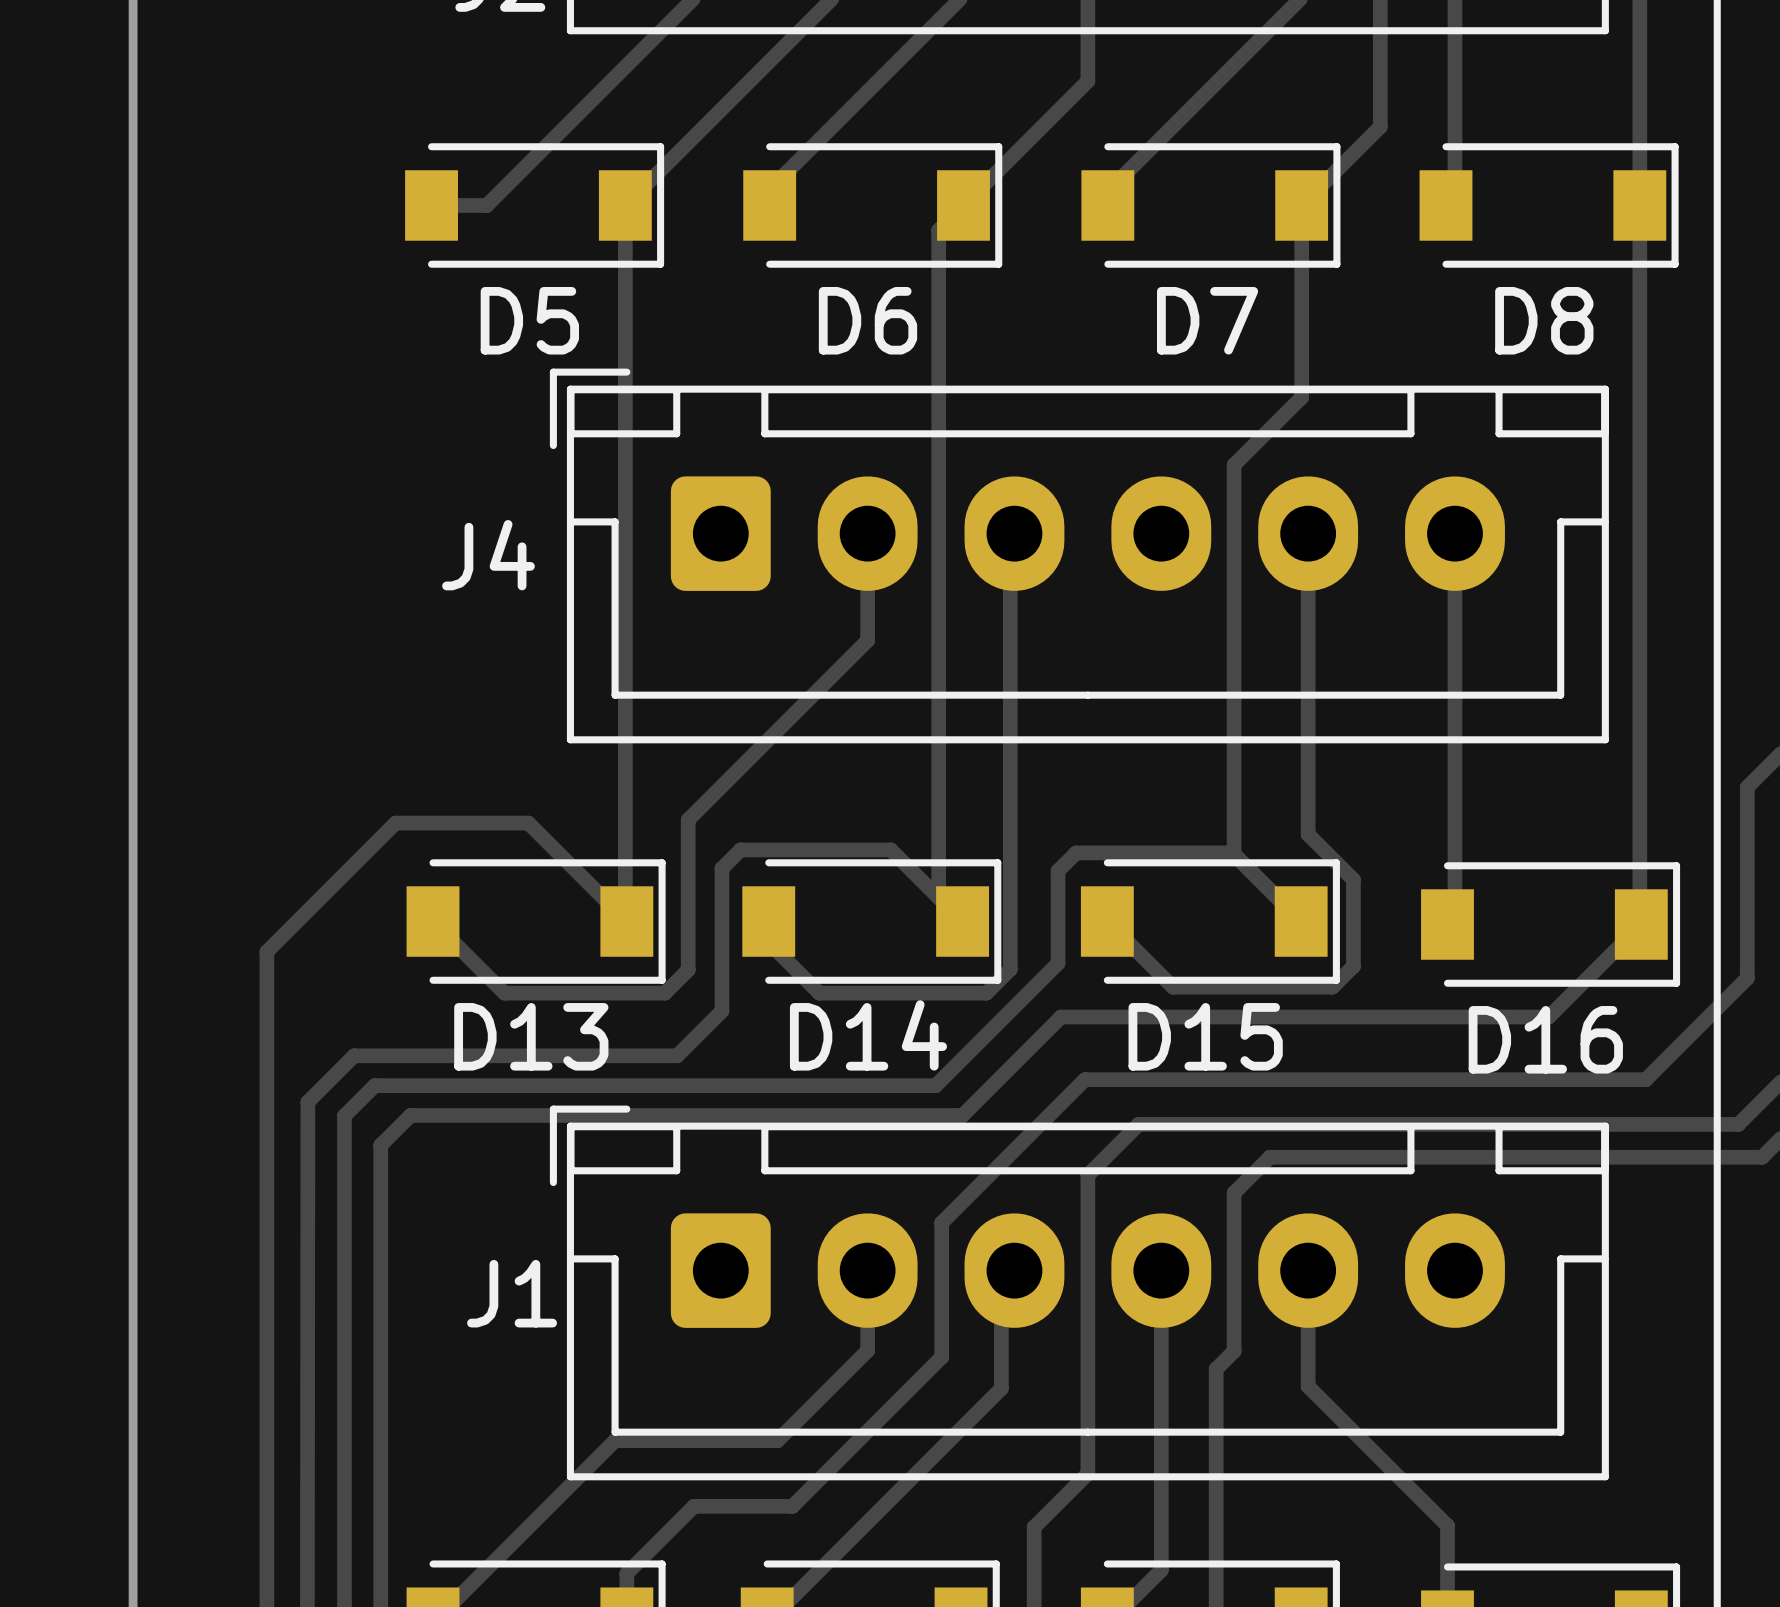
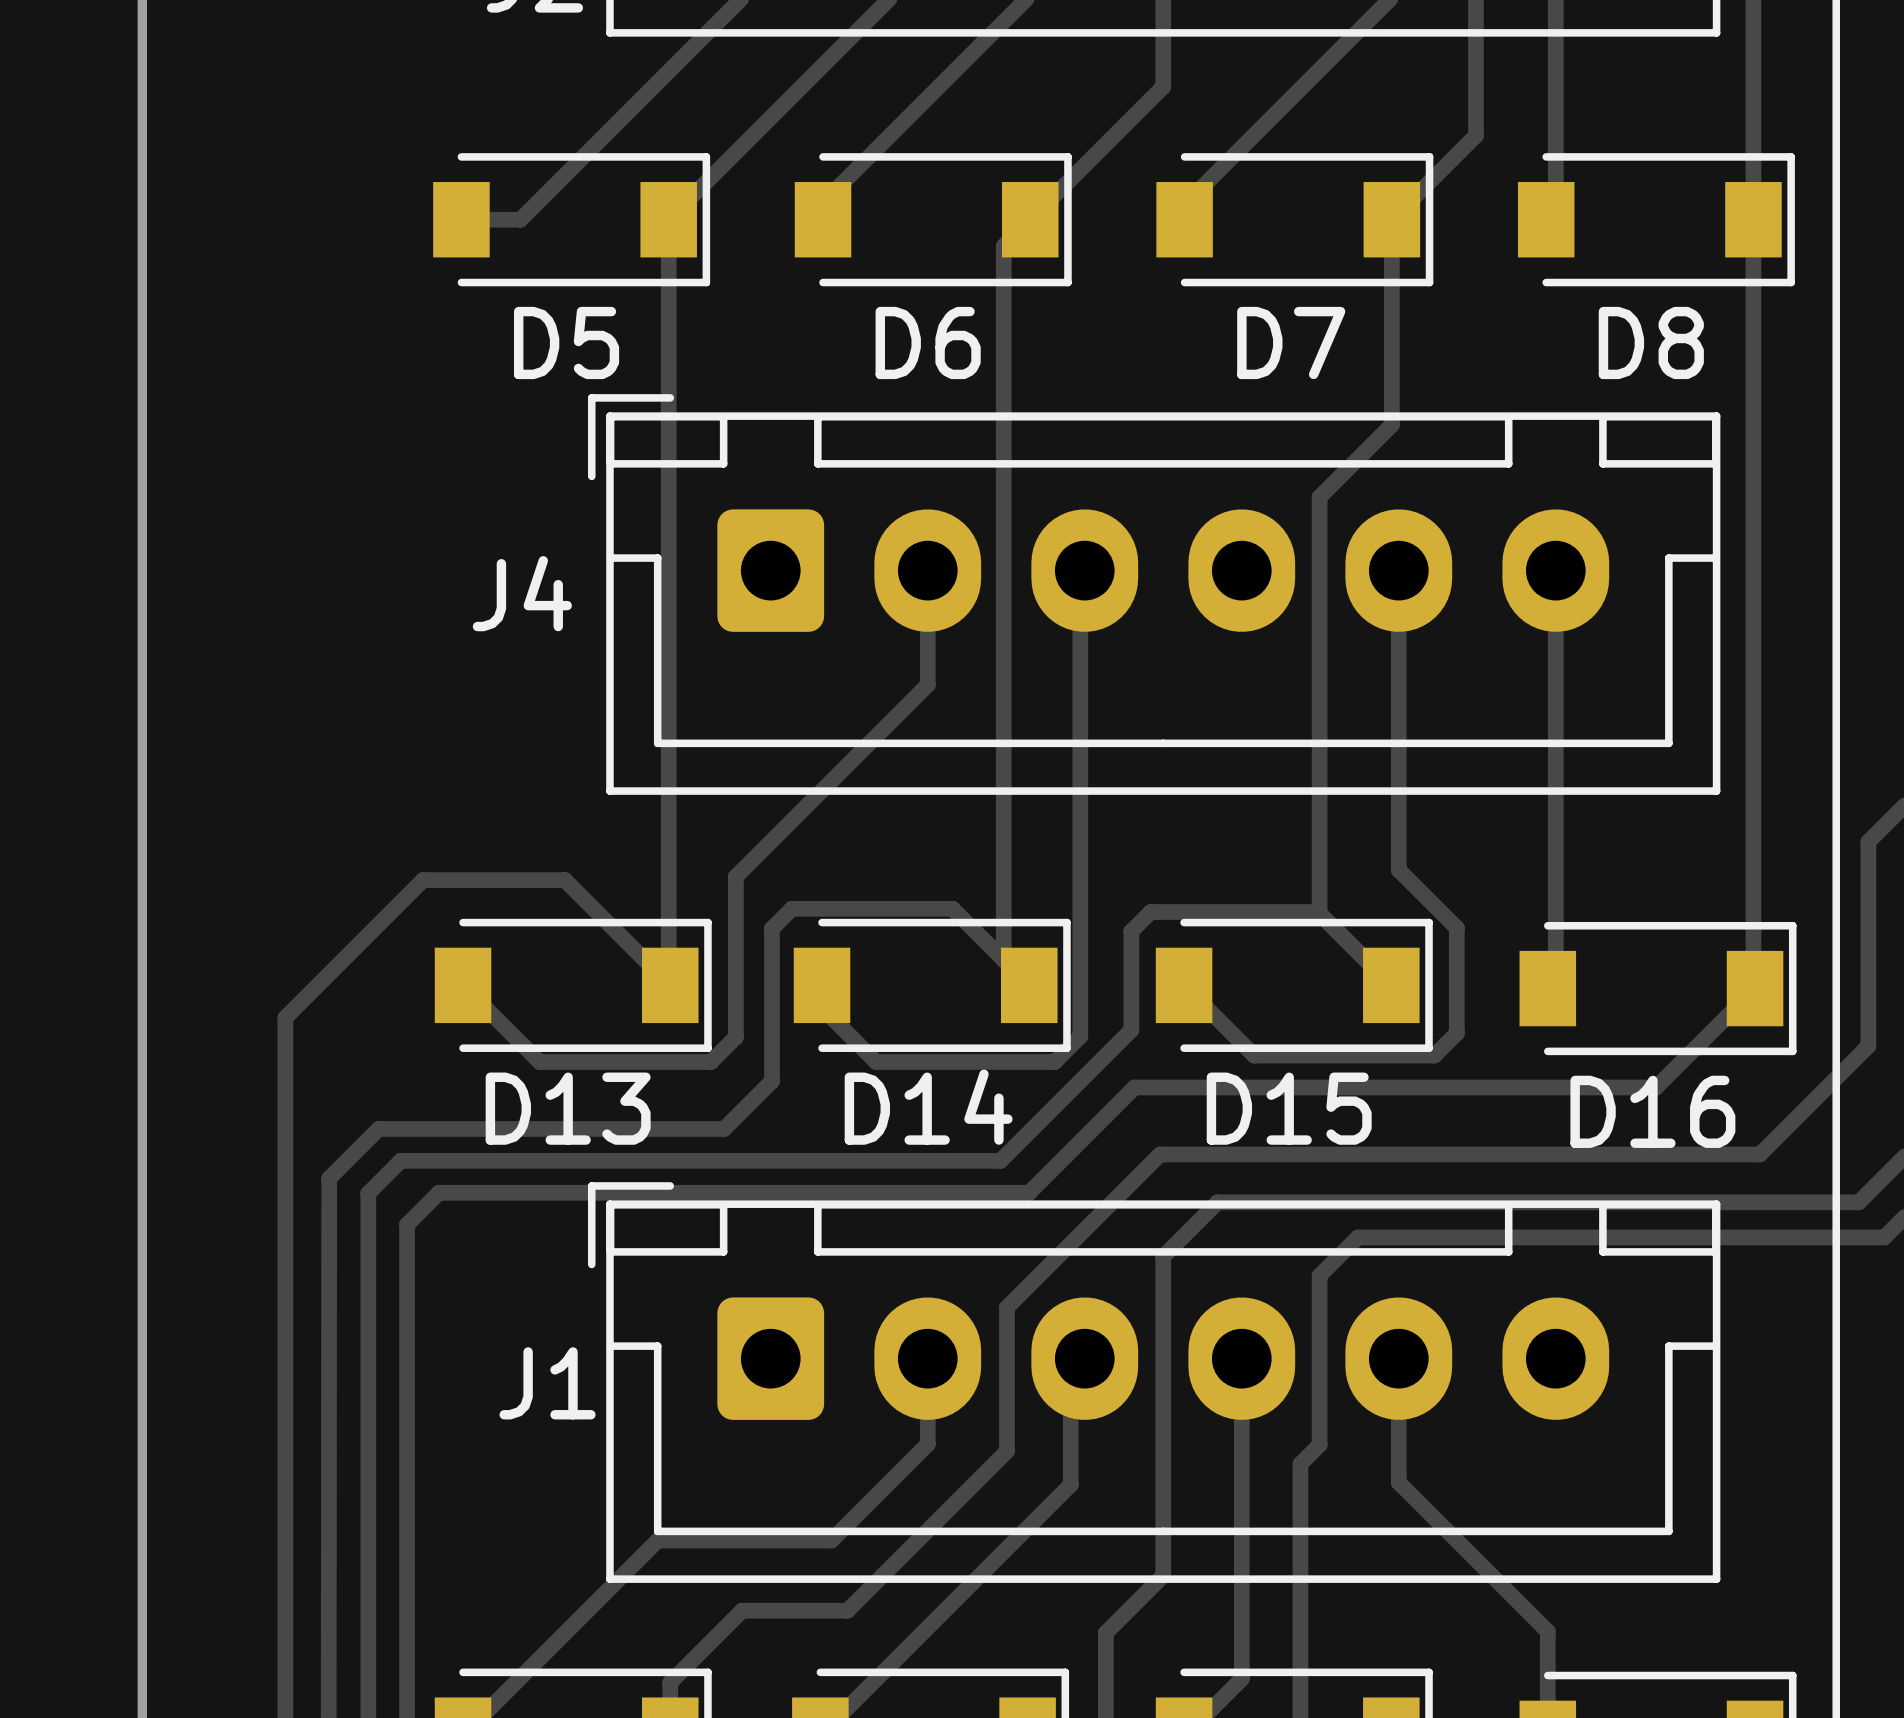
track: (1308, 813) (1308, 834) (1353, 879) (1353, 966) (1332, 987) -> (1398, 869) (1456, 927) (1456, 1033) (1434, 1055) (1424, 1055)

